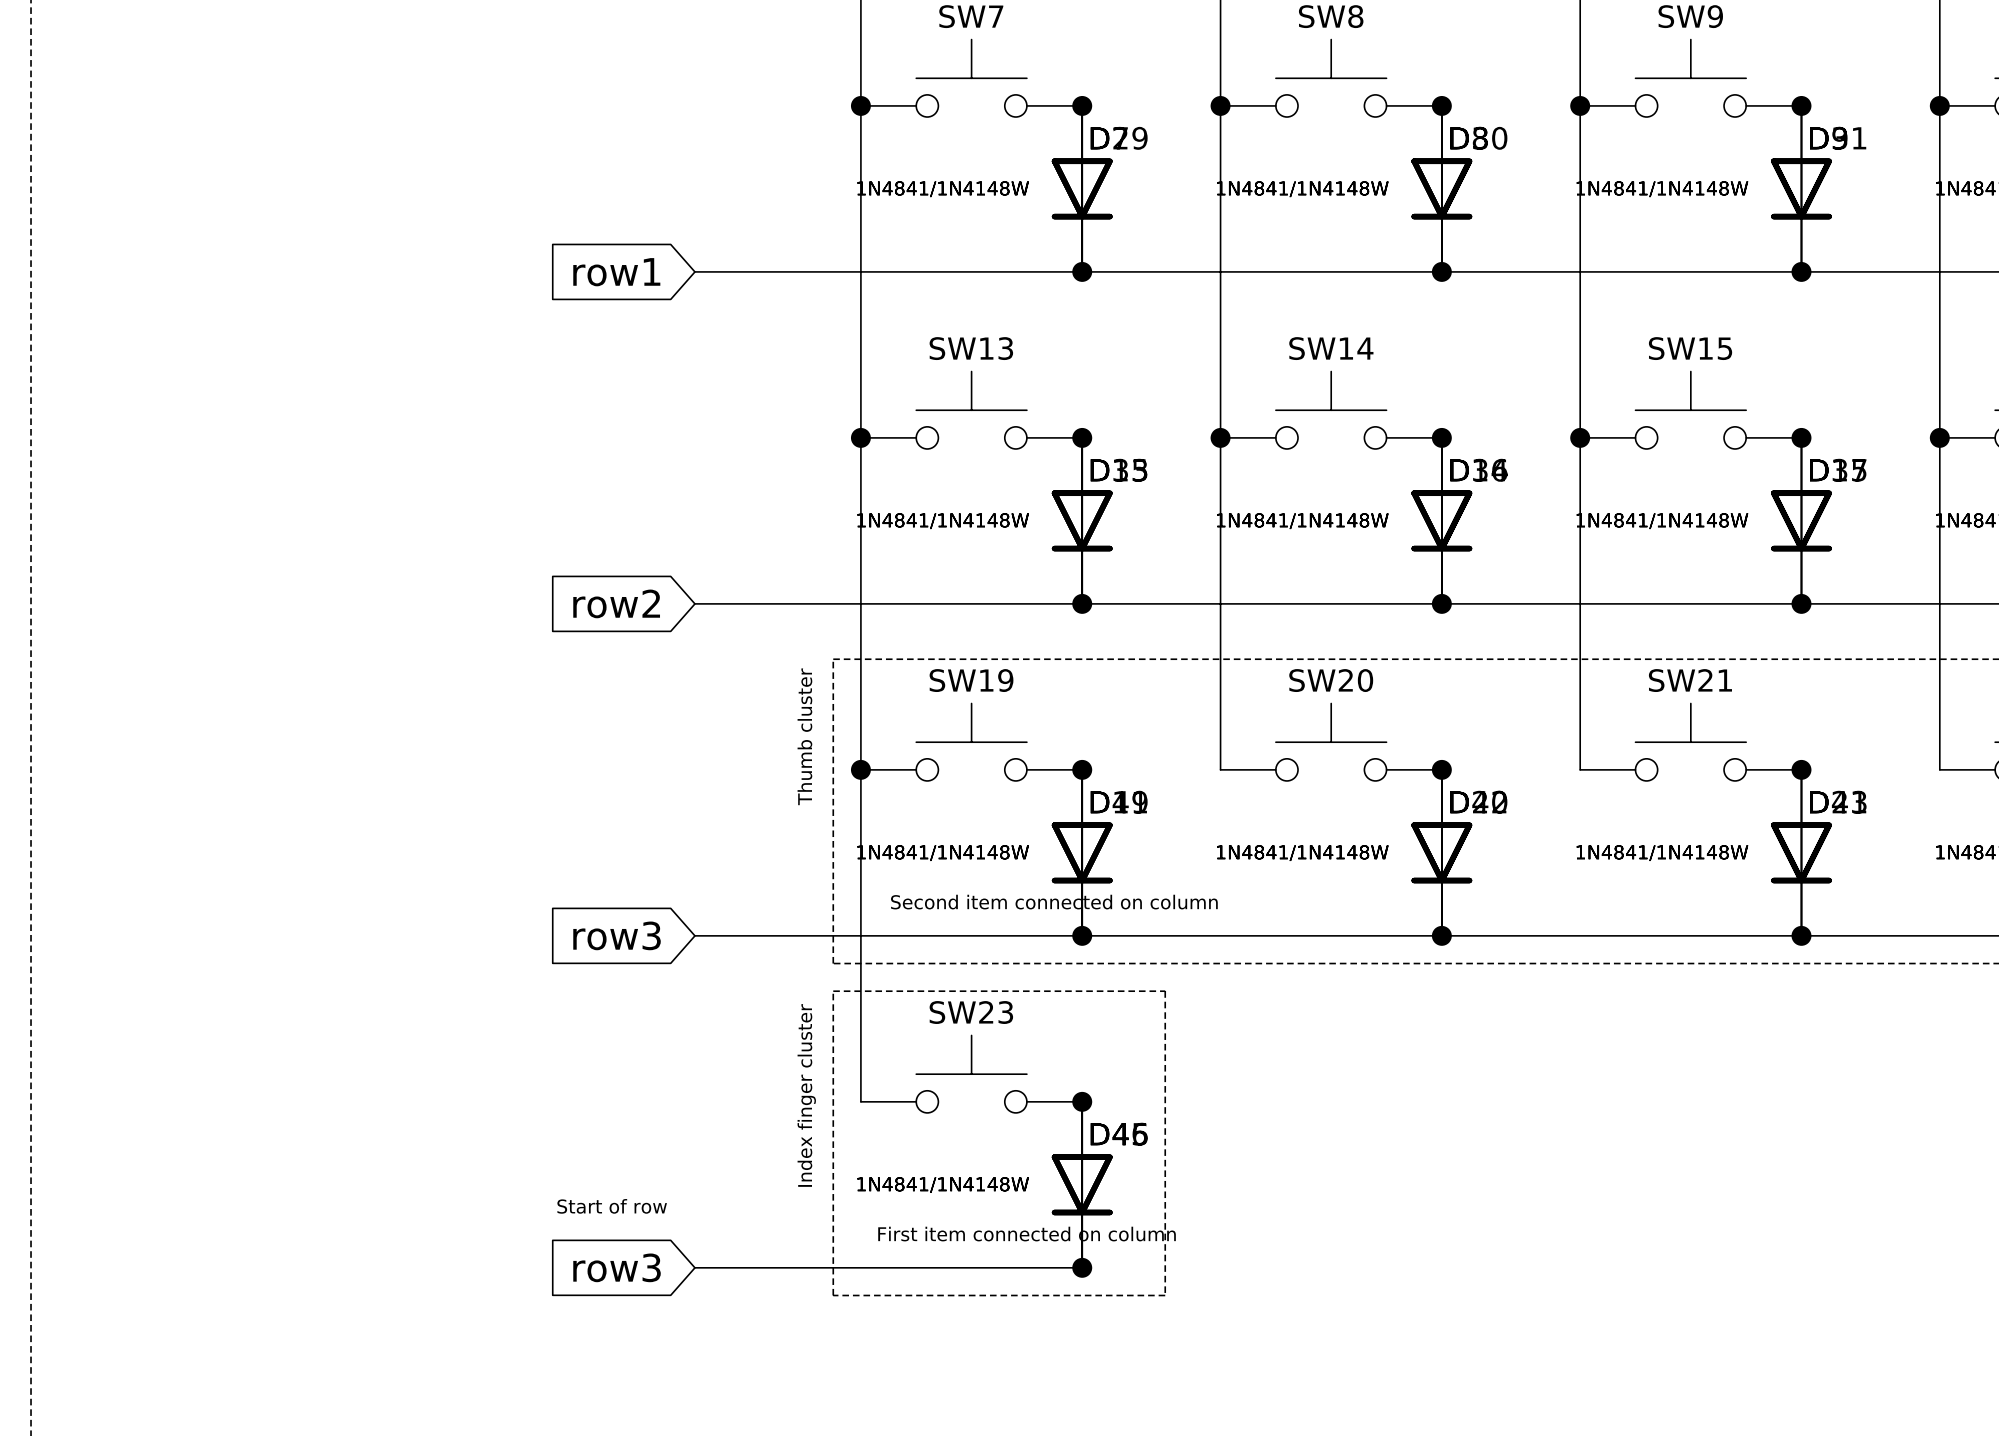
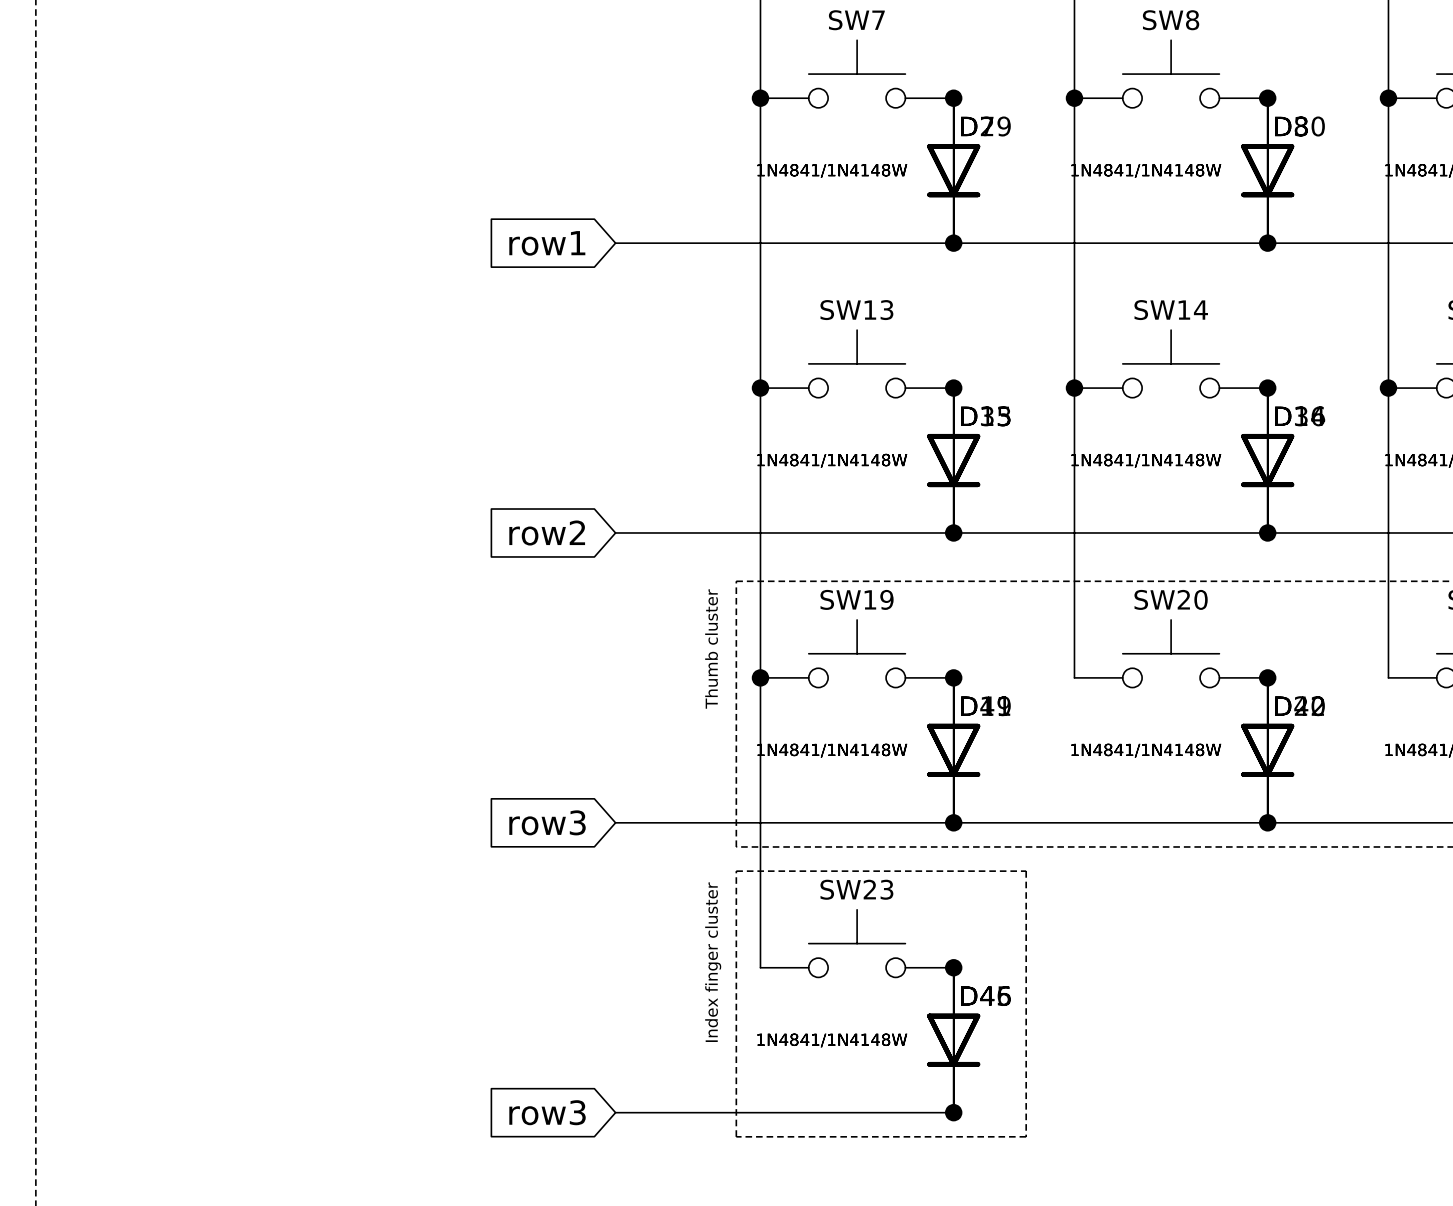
text: Second item connected on column (1054, 902) -> none
text: Start of row (612, 1206) -> none
text: First item connected on column (1027, 1234) -> none

